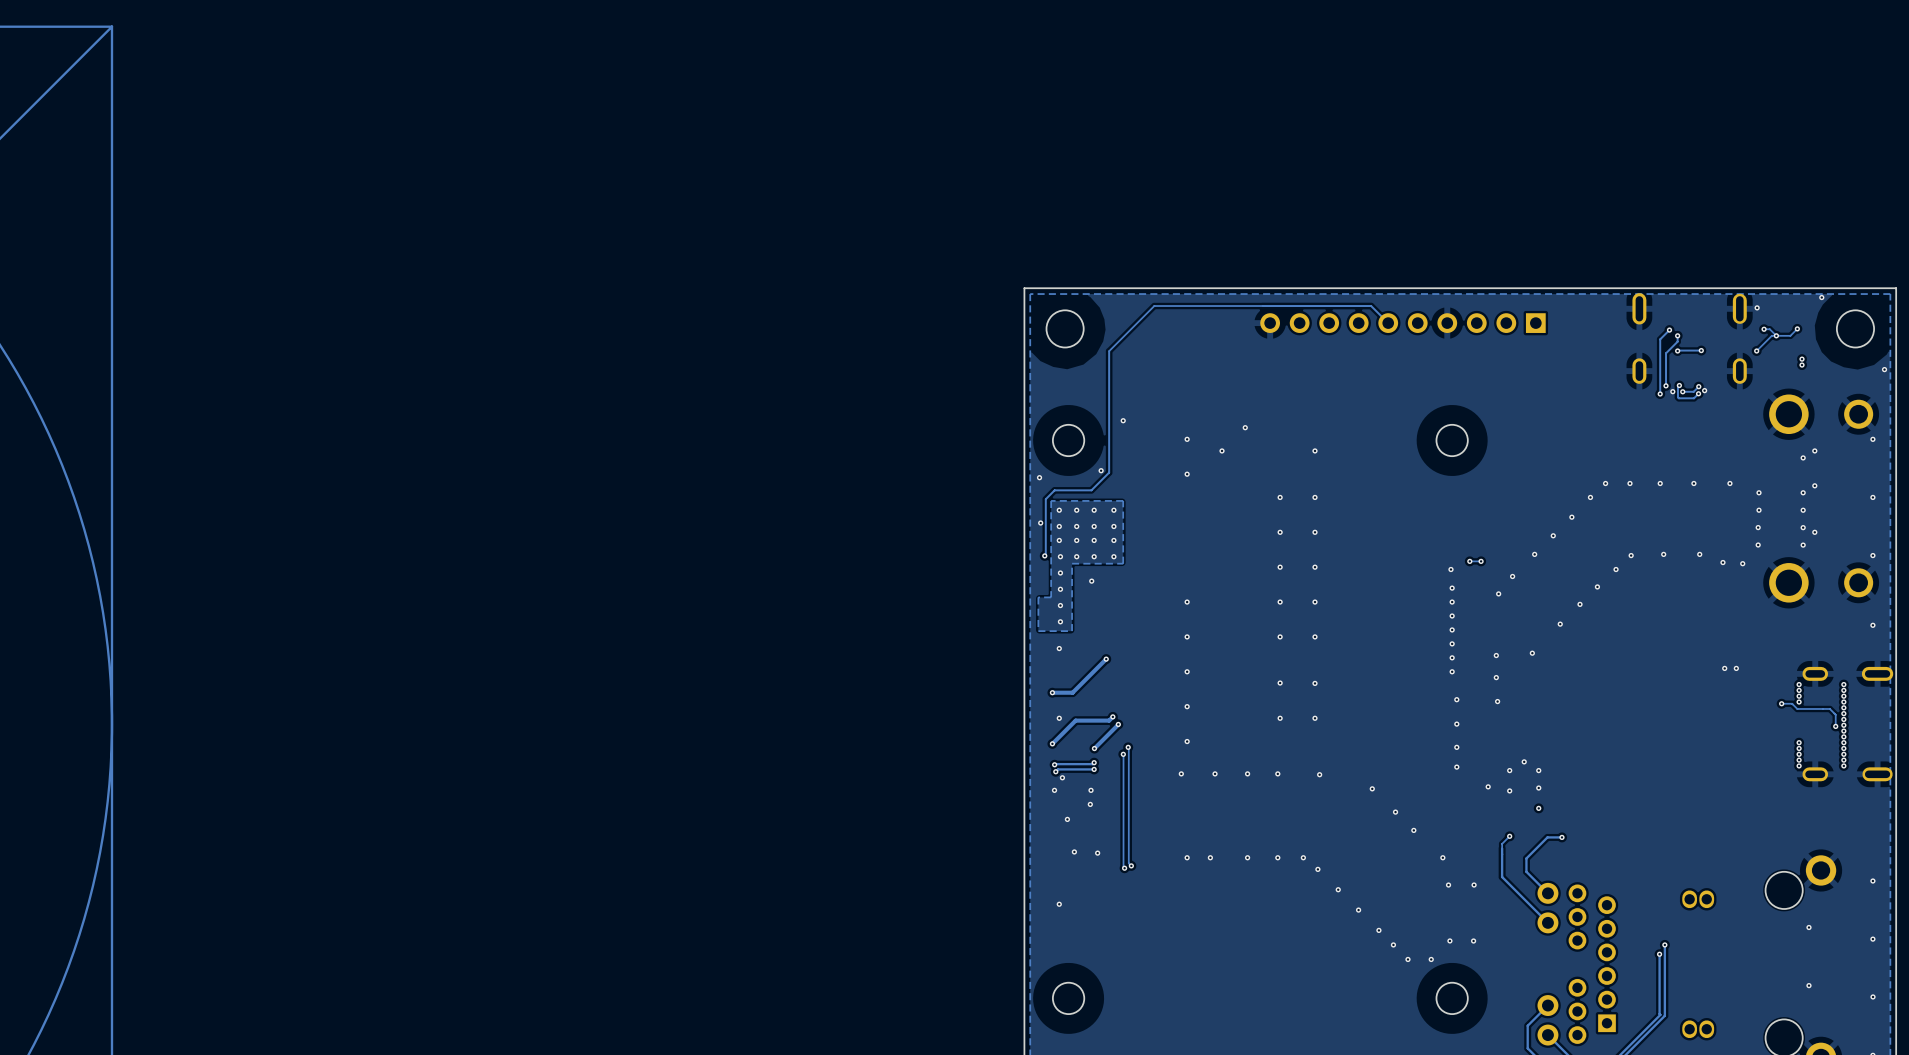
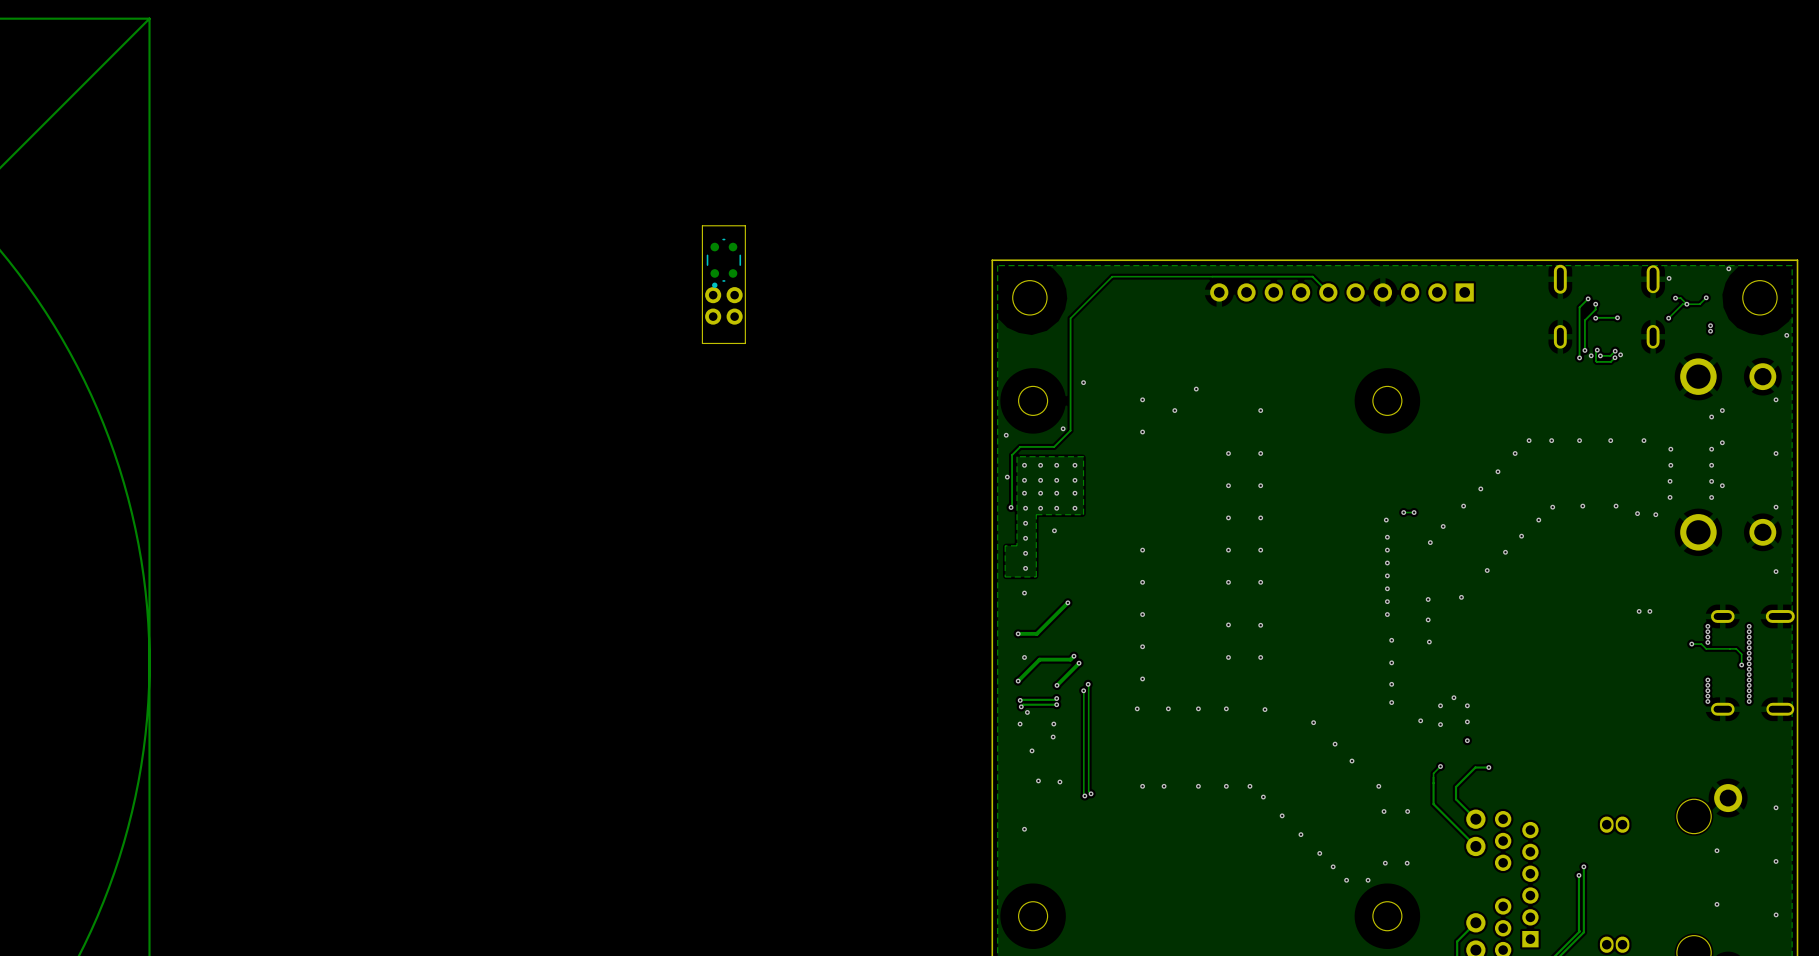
board edge: none -> (745, 225) (702, 225) (702, 343) (745, 343) (745, 225)
part: none -> (723, 263)
part: none -> (723, 305)

